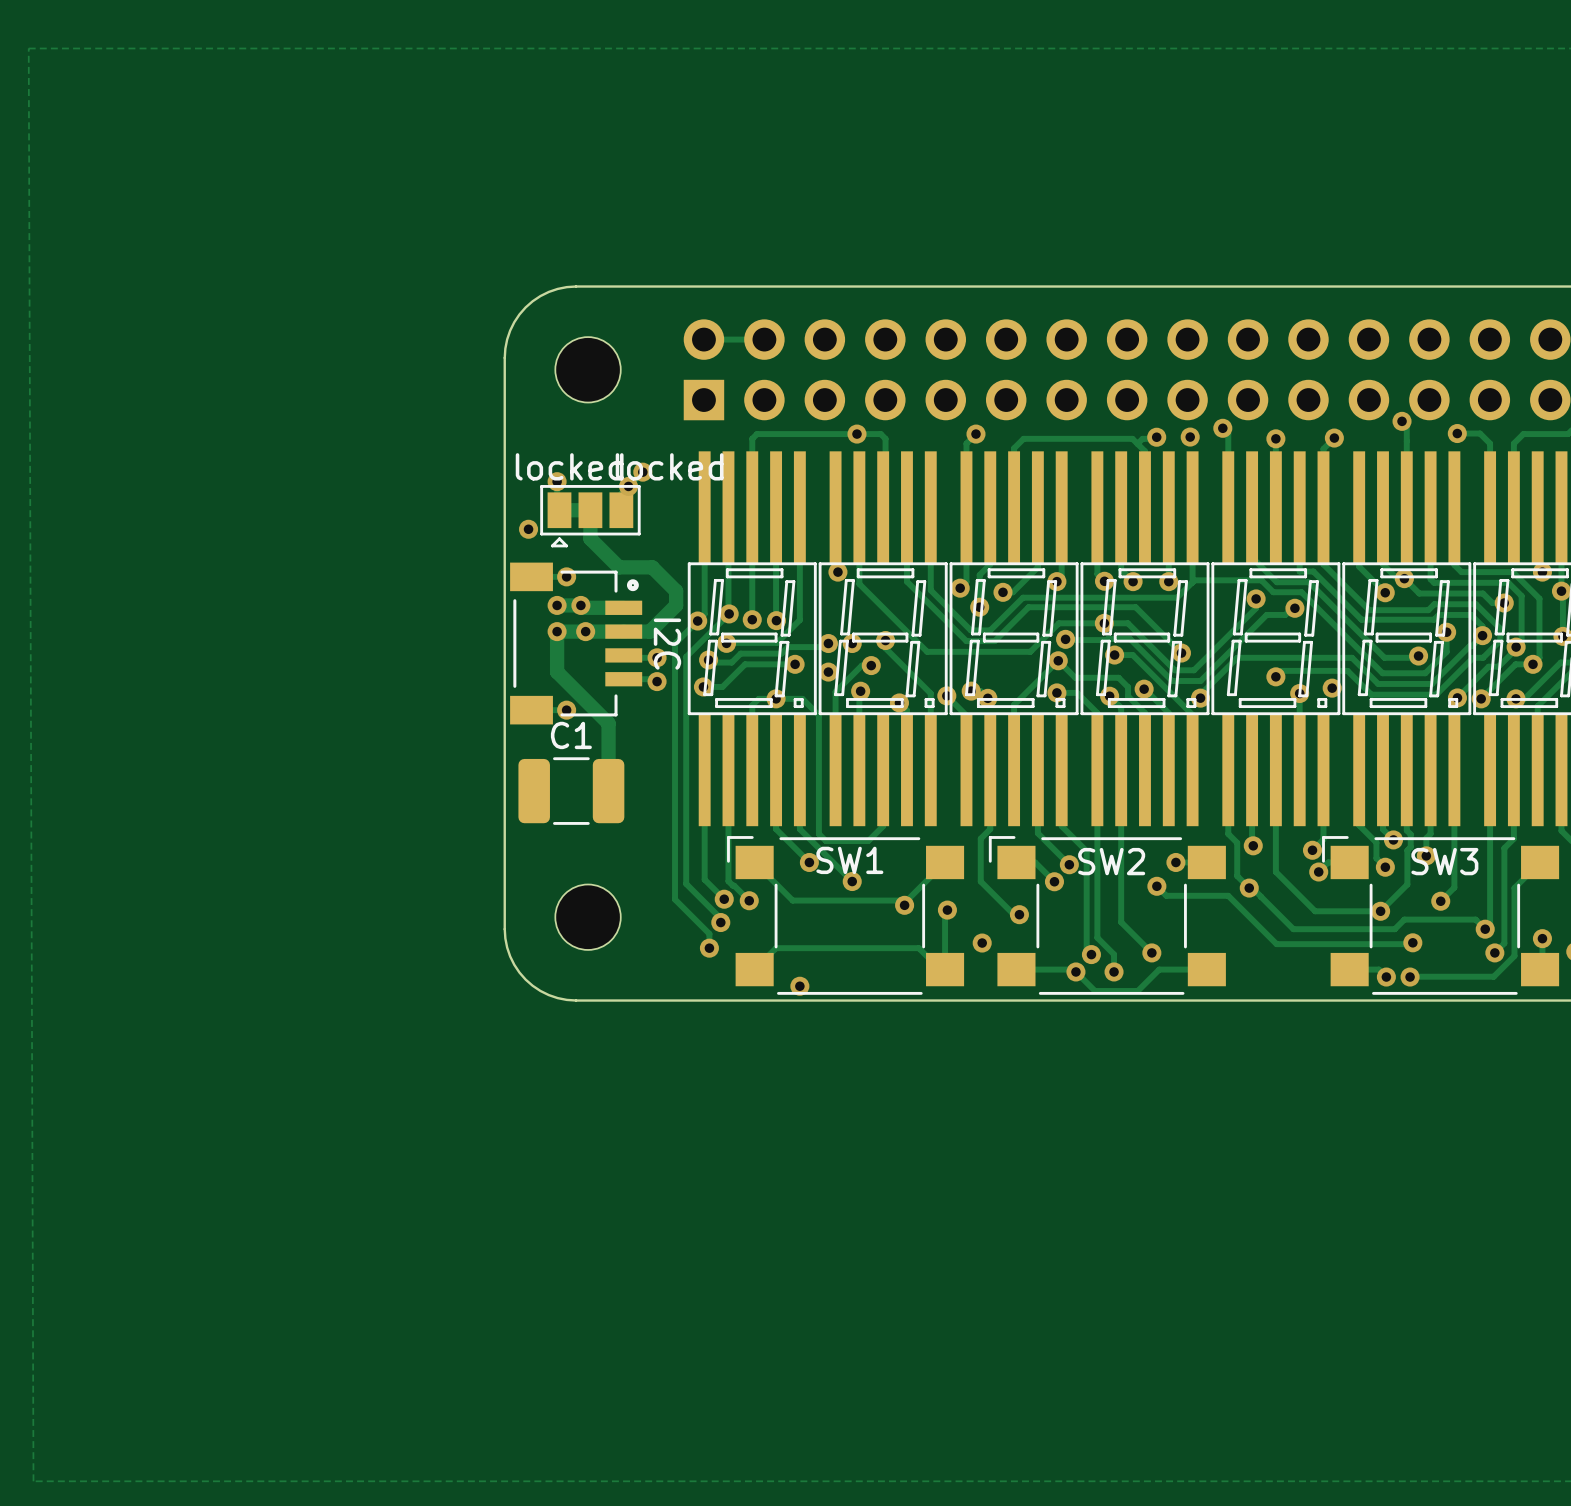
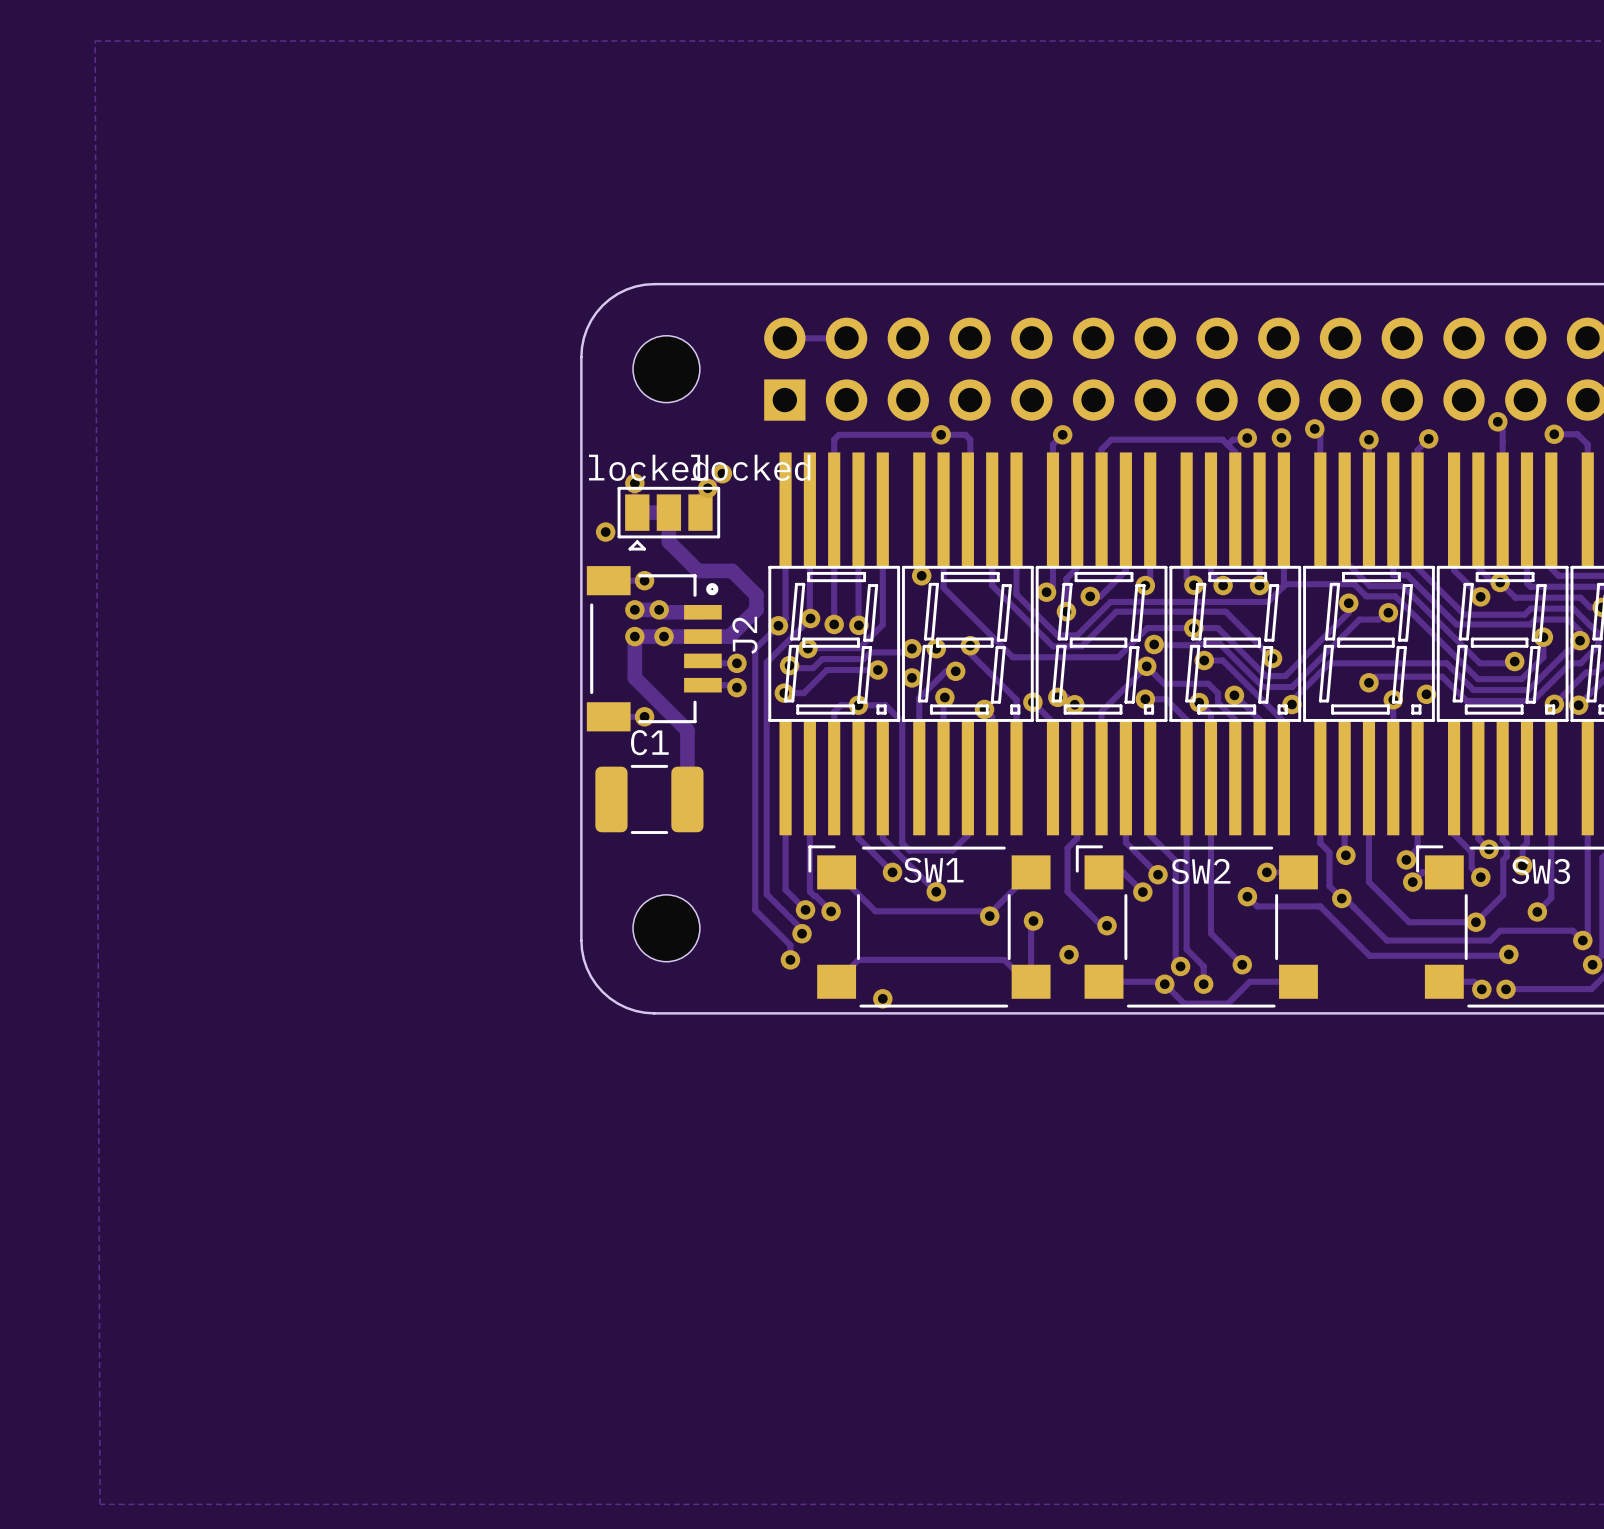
J2 name: none -> J2 (744, 635)
J2 text: I2C (667, 644) -> none

